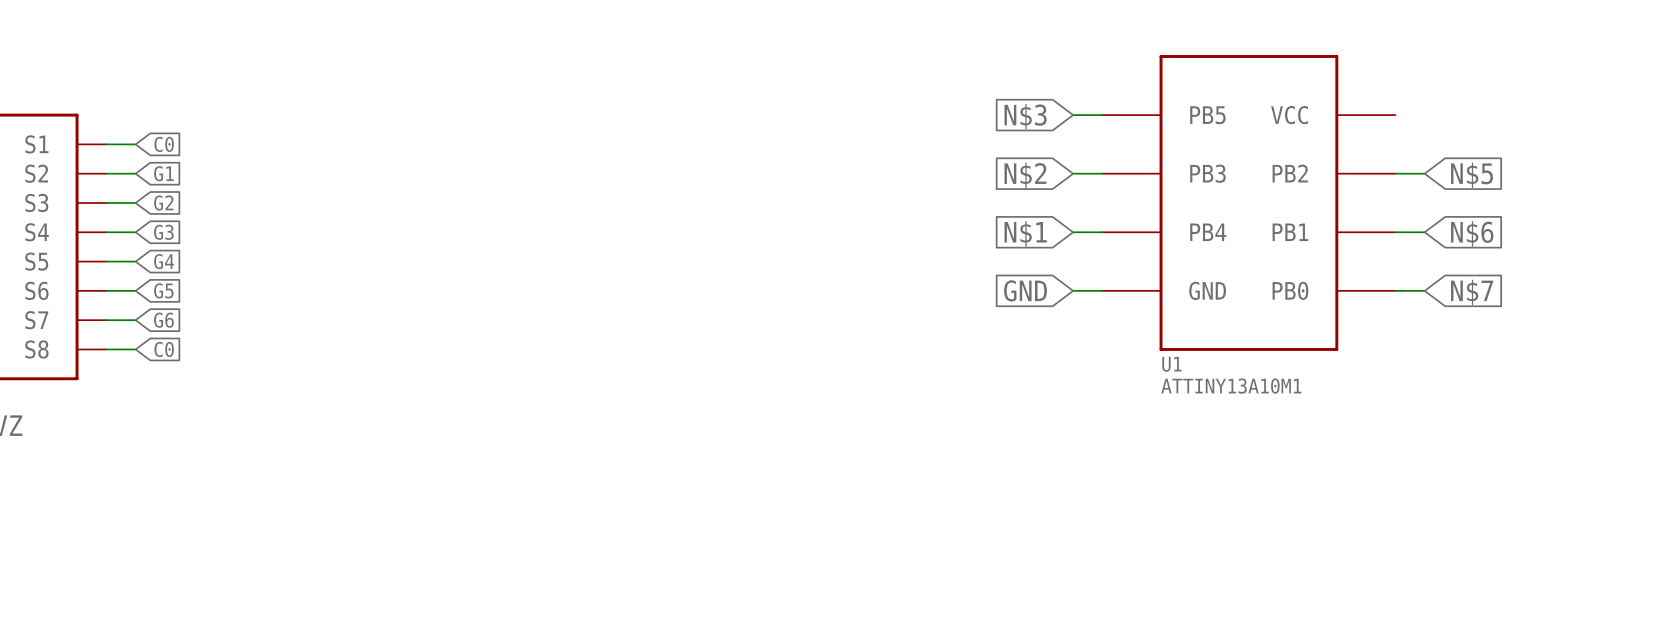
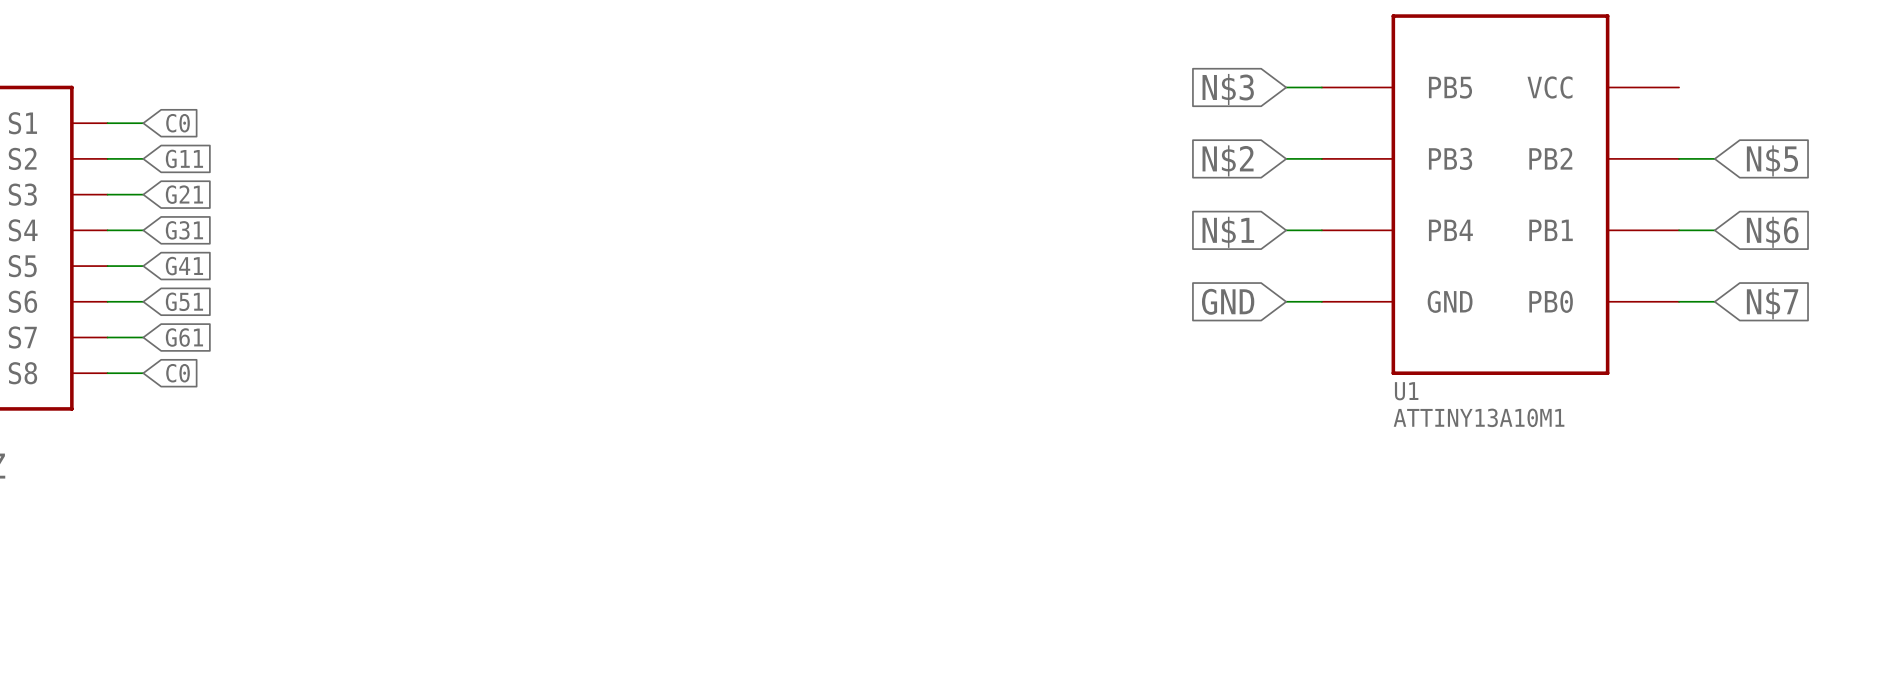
global label: G1 (163, 173) -> G11 (184, 158)
global label: G2 (163, 202) -> G21 (184, 194)
global label: G3 (163, 232) -> G31 (184, 230)
global label: G4 (164, 261) -> G41 (184, 266)
global label: G5 (163, 290) -> G51 (184, 301)
global label: G6 (163, 320) -> G61 (184, 337)

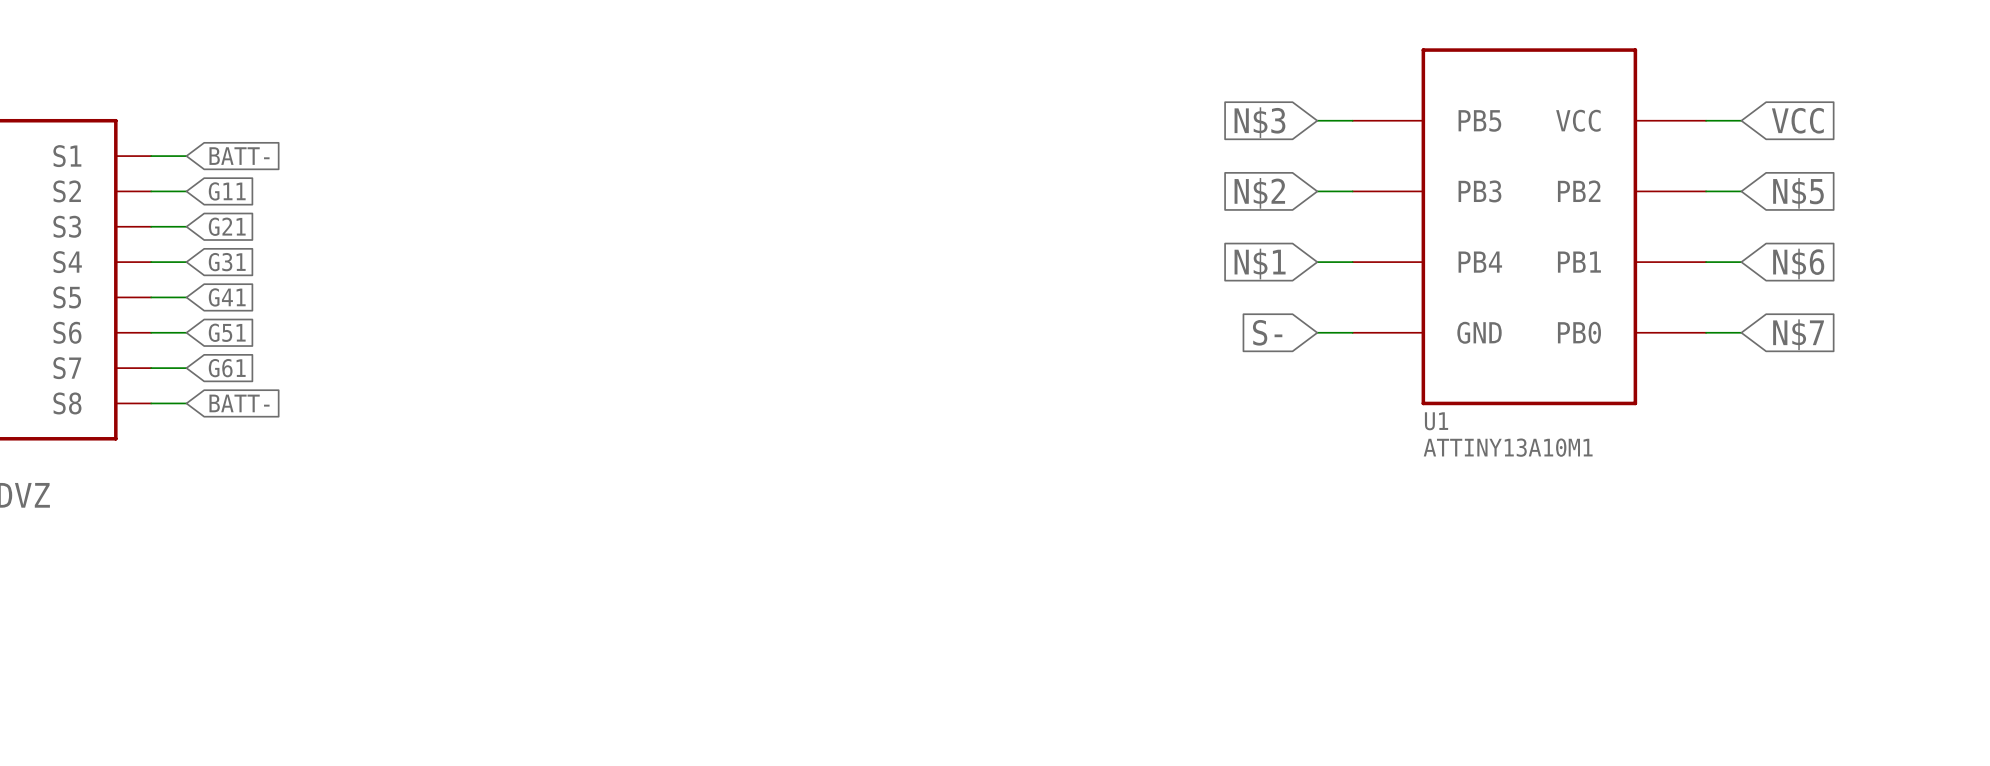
wire: none -> (1706, 120) (1741, 120)
global label: none -> VCC (1797, 120)
global label: C0 (178, 123) -> BATT- (239, 156)
global label: GND (1228, 301) -> S- (1267, 332)
global label: C0 (178, 373) -> BATT- (239, 403)

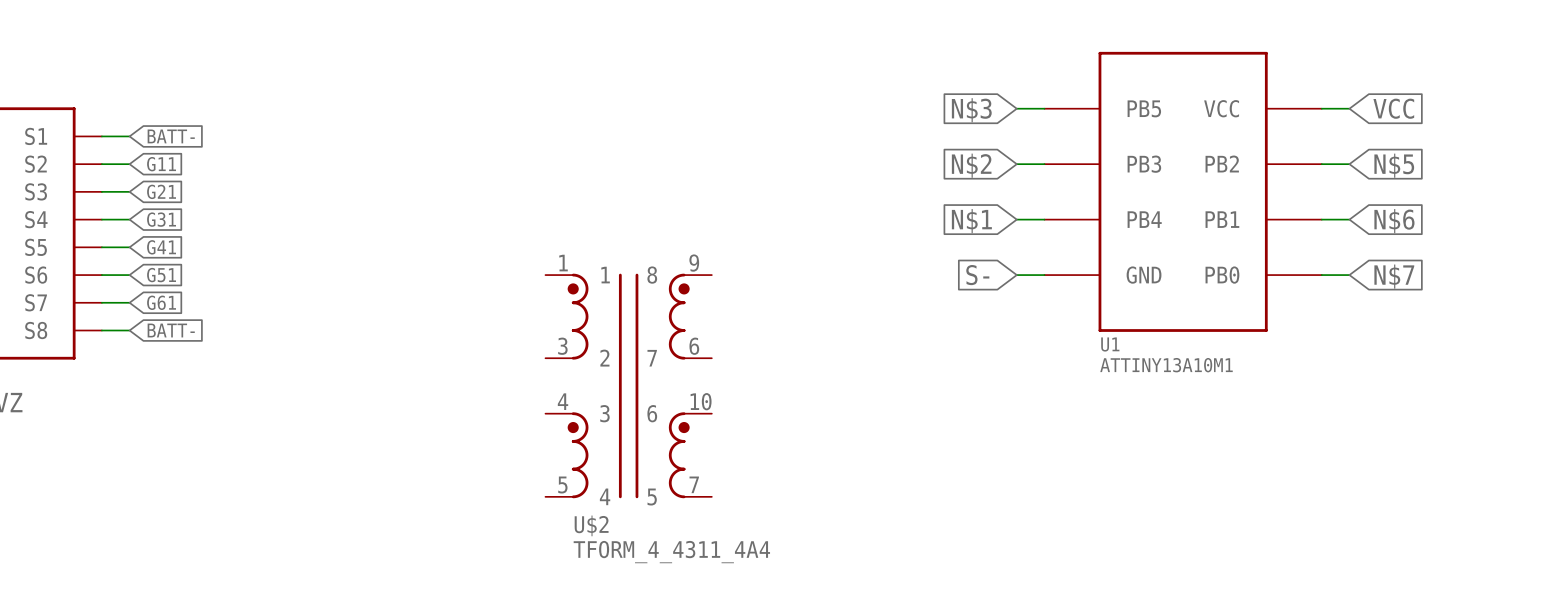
U$2: none -> TFORM_4_4311_4A4 (628, 385)

